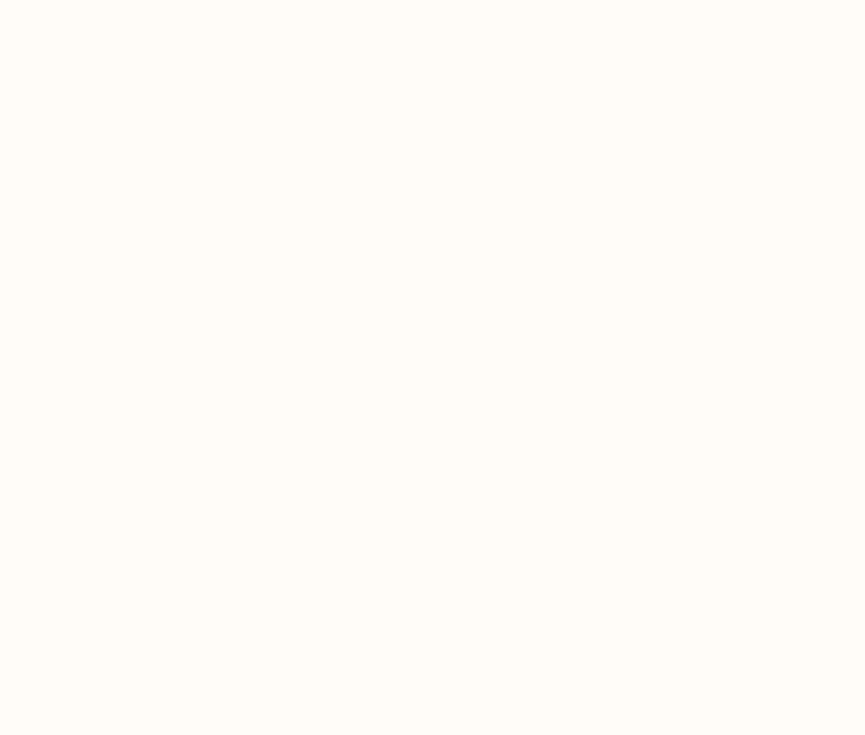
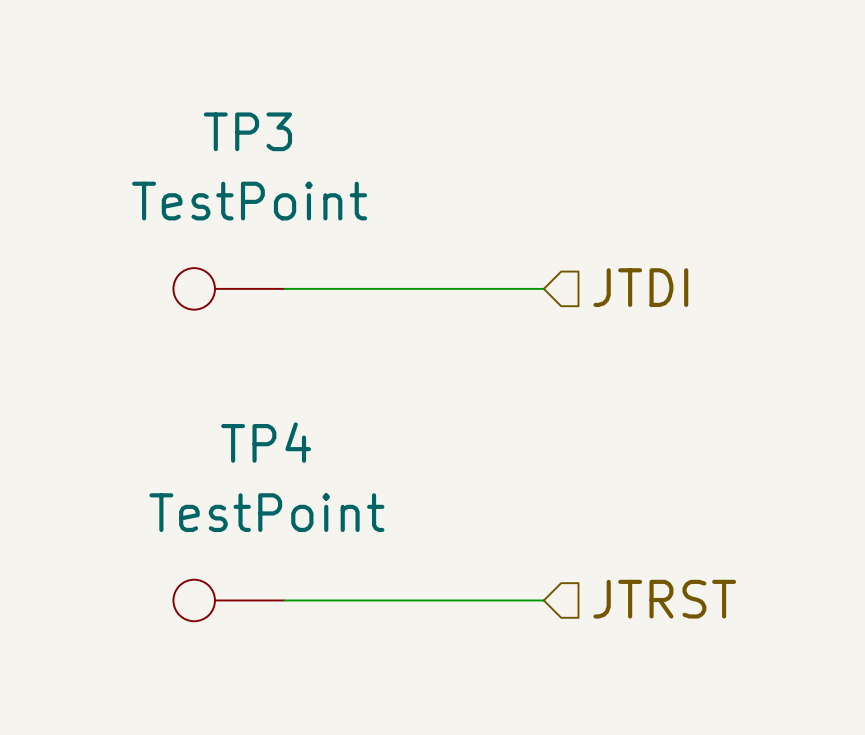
hierarchical label: none -> JTDI (640, 287)
TP3: none -> TestPoint (228, 288)
wire: none -> (284, 288) (543, 288)
hierarchical label: none -> JTRST (664, 599)
TP4: none -> TestPoint (228, 600)
wire: none -> (284, 600) (543, 600)

